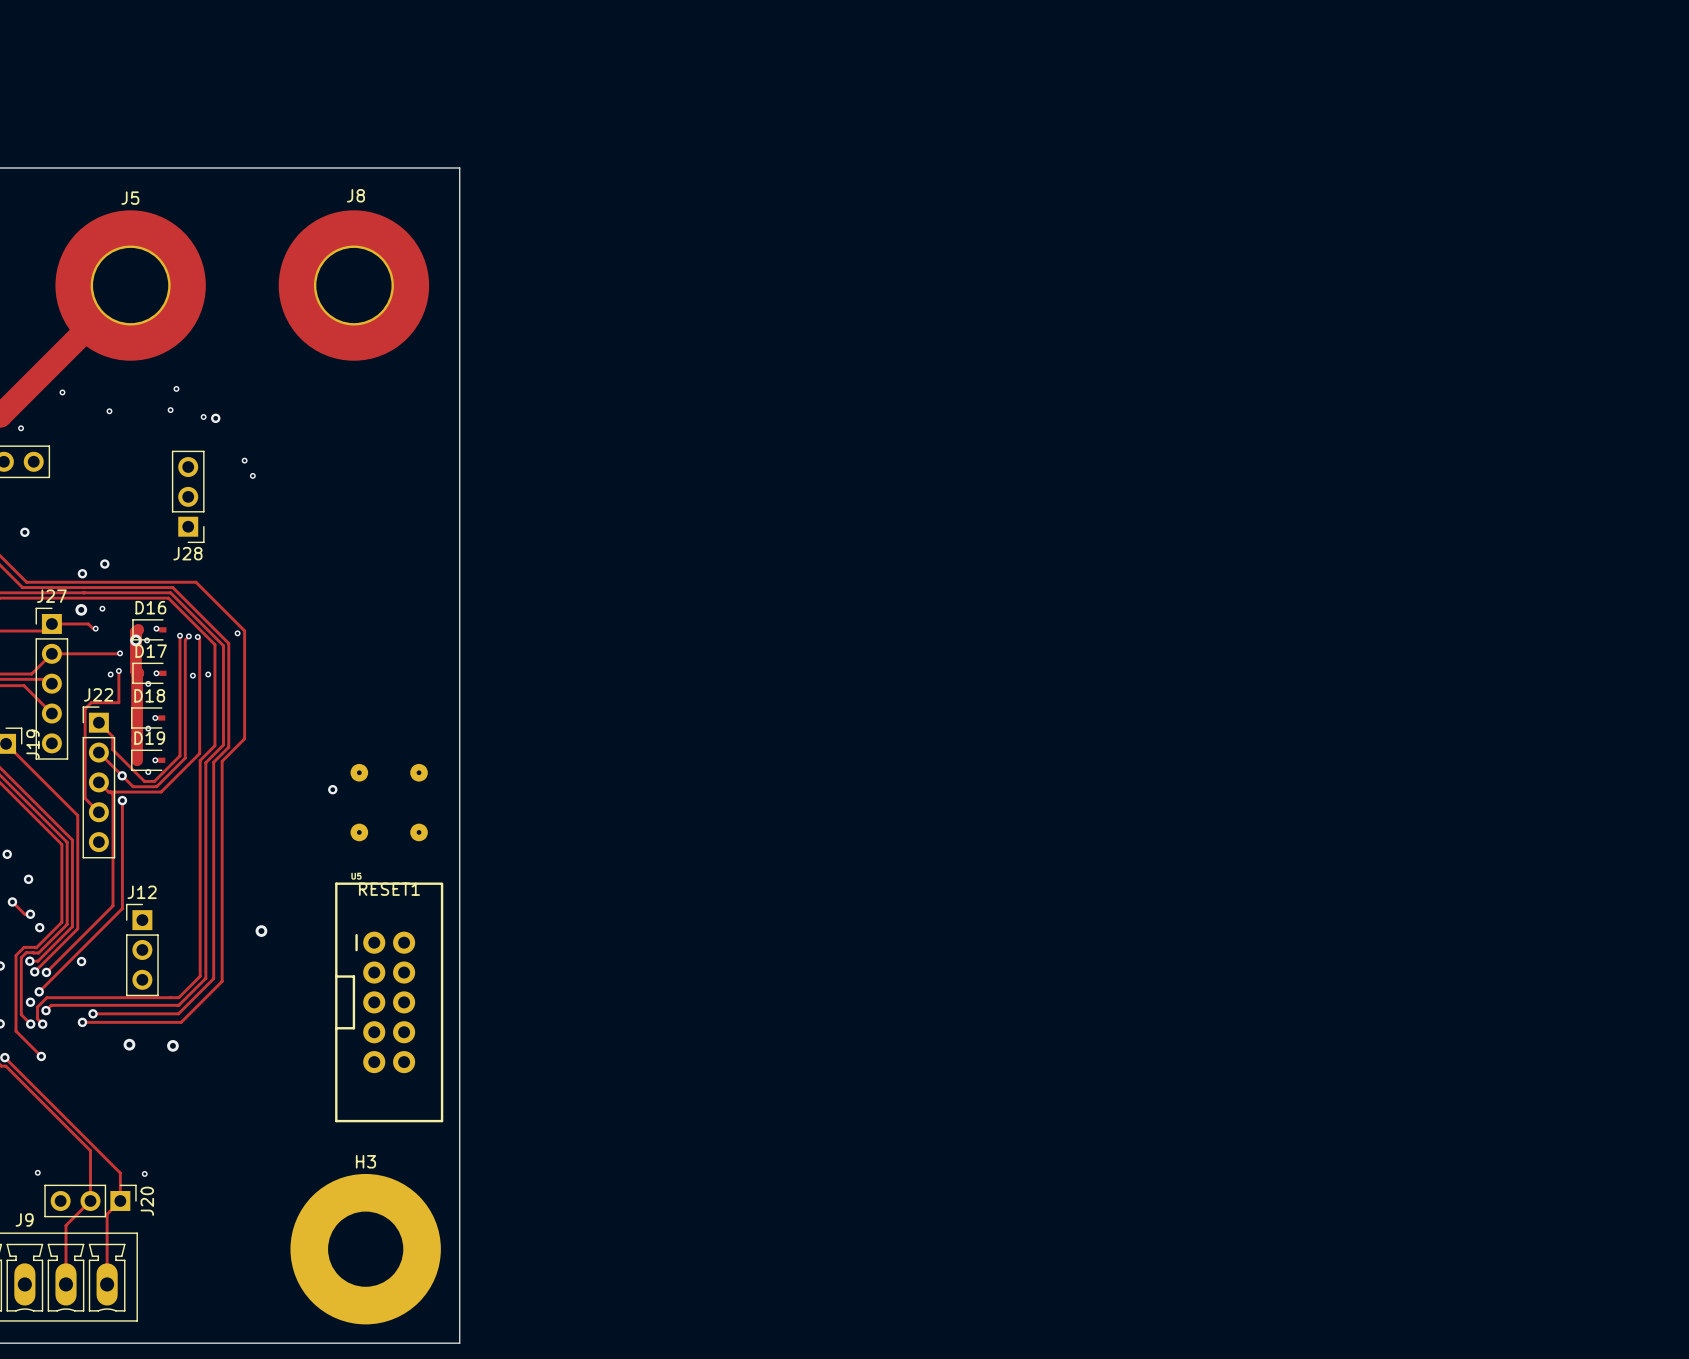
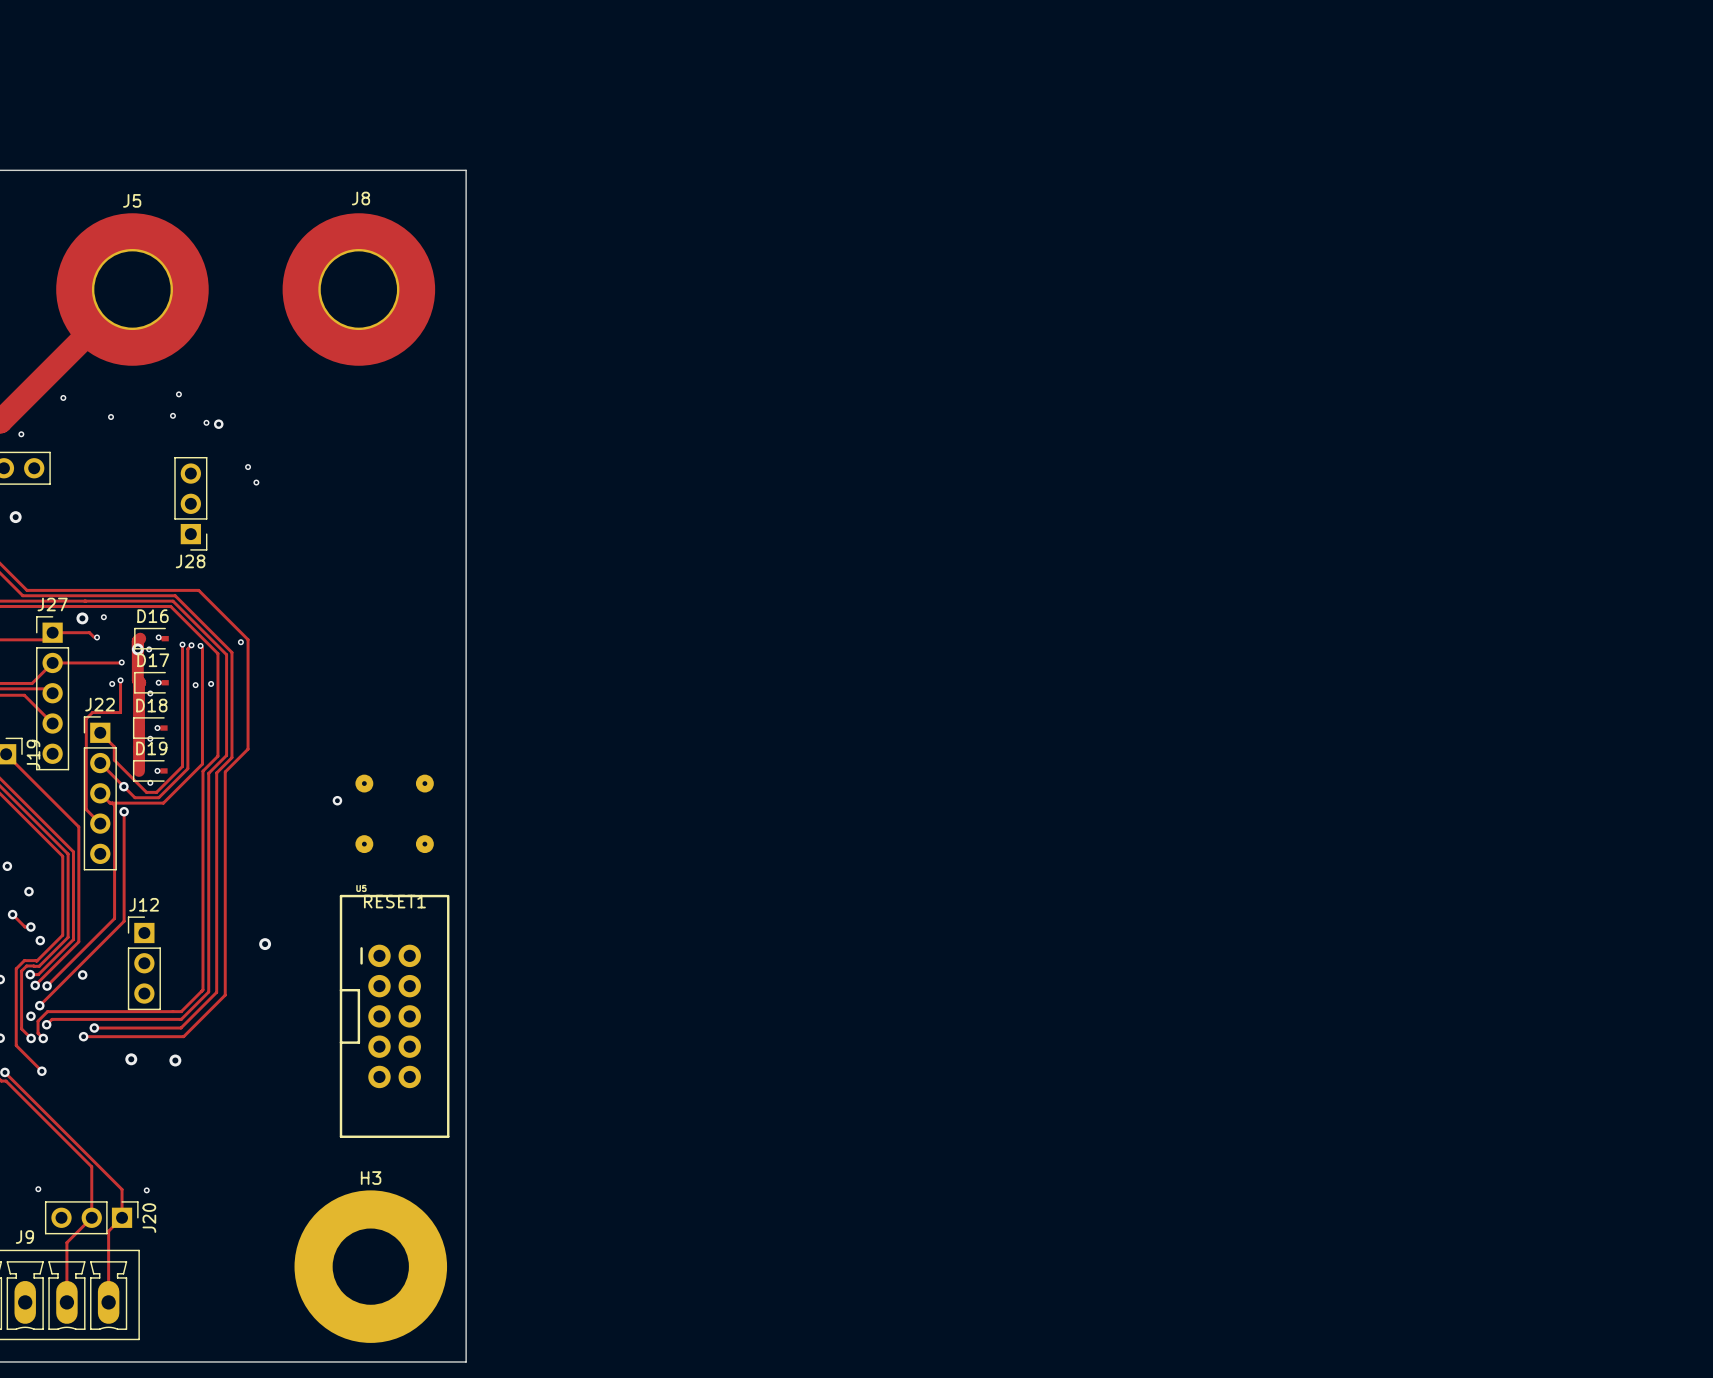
via: none -> (15, 517)
via: (24, 532) -> none
via: (104, 564) -> none
via: (82, 573) -> none

